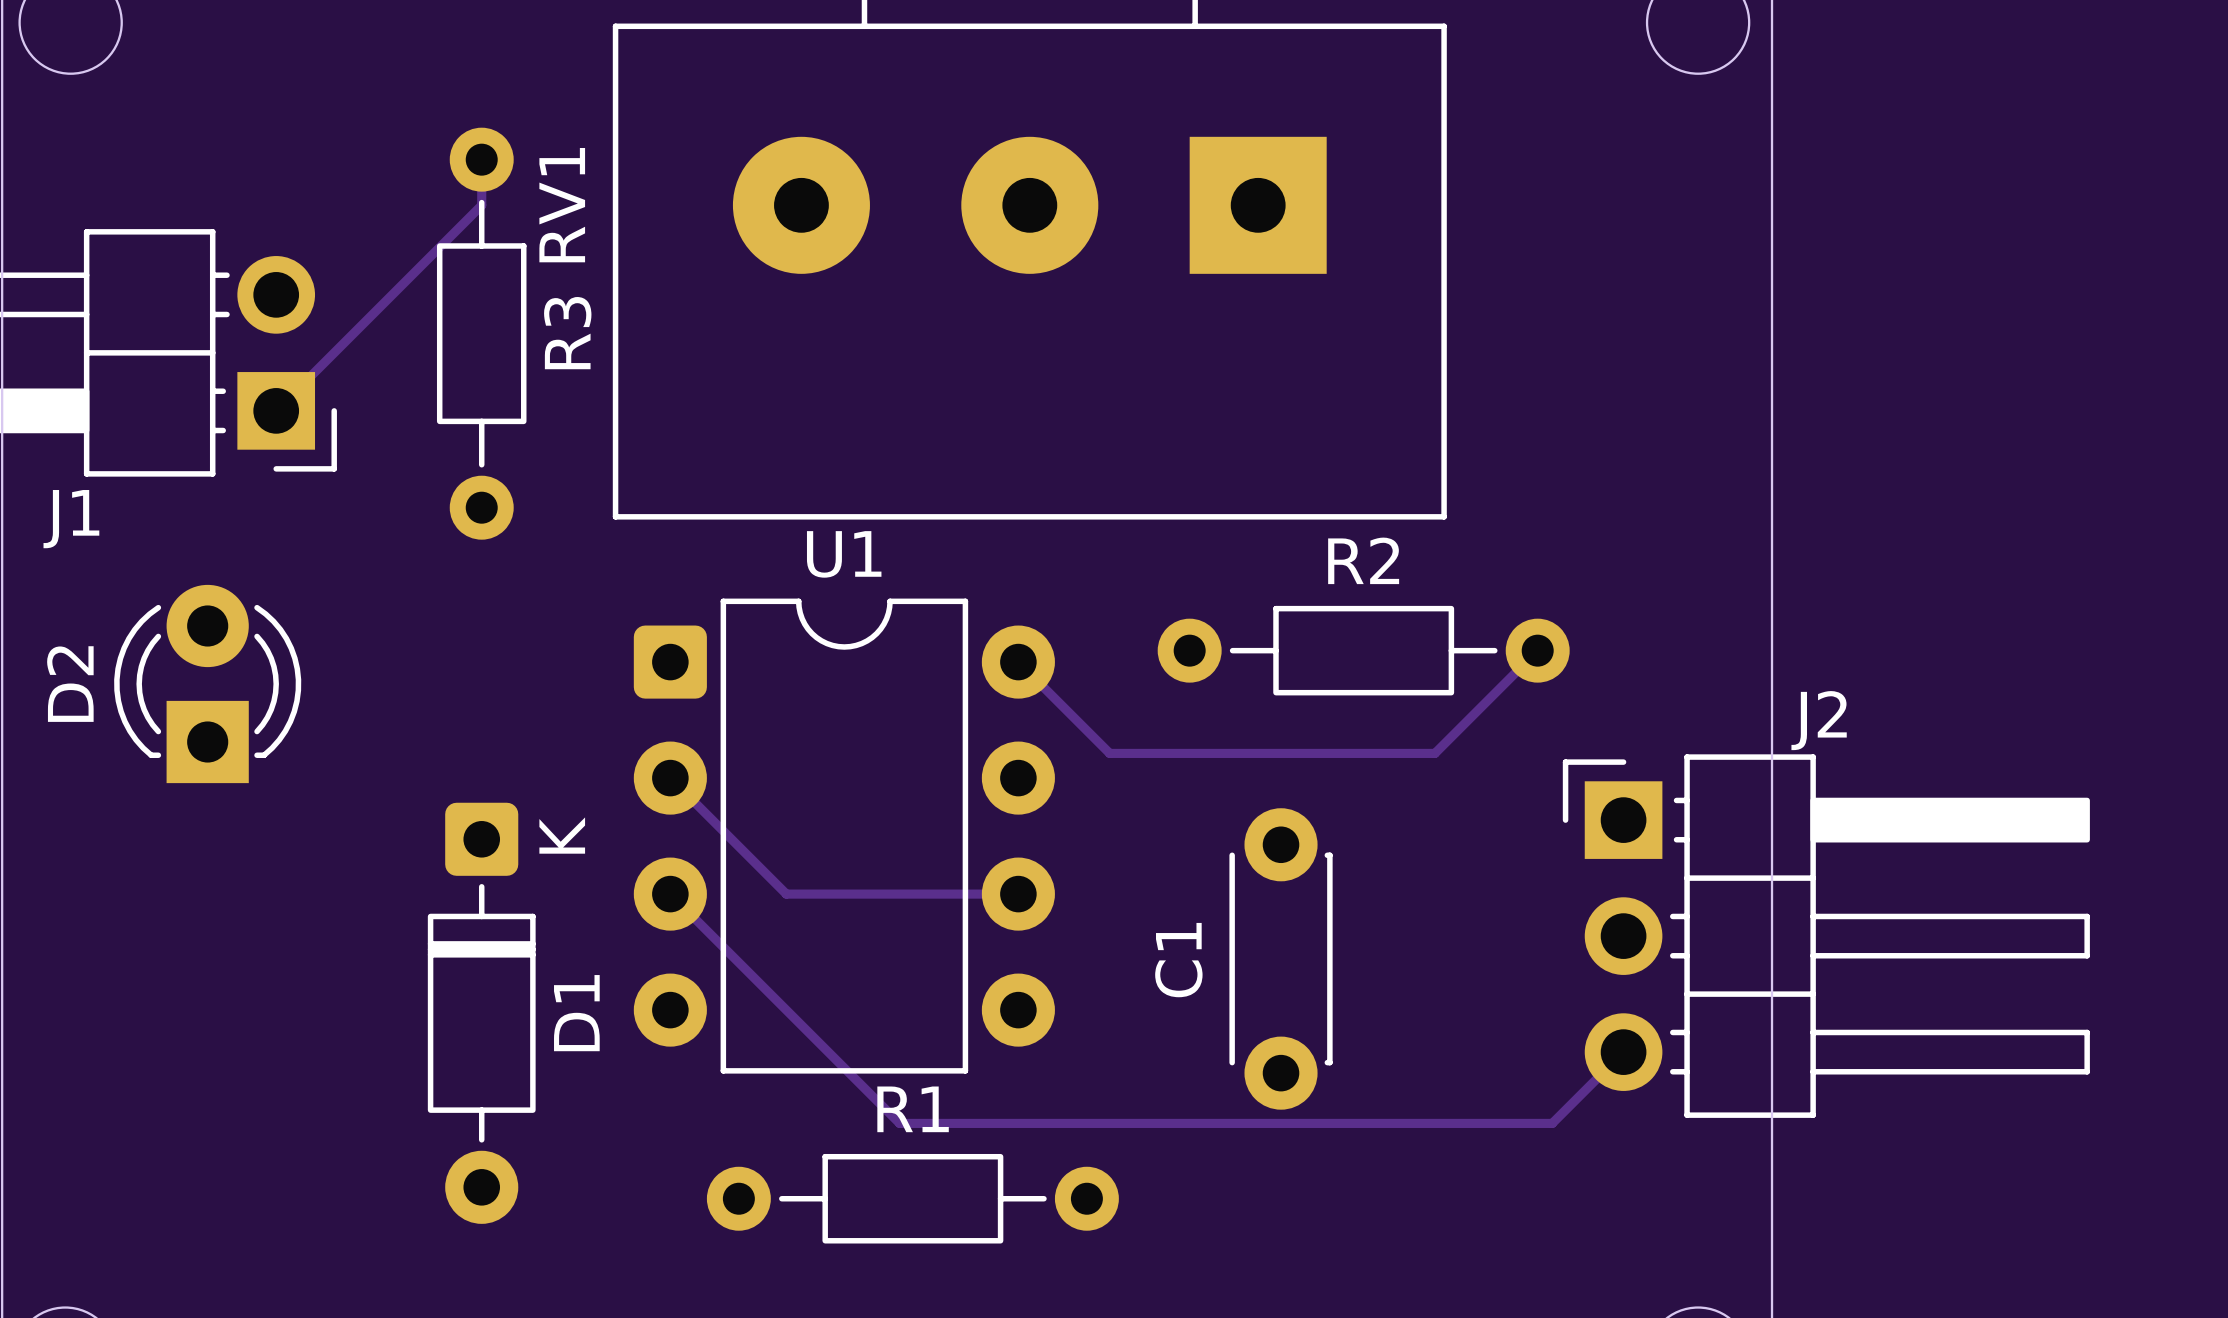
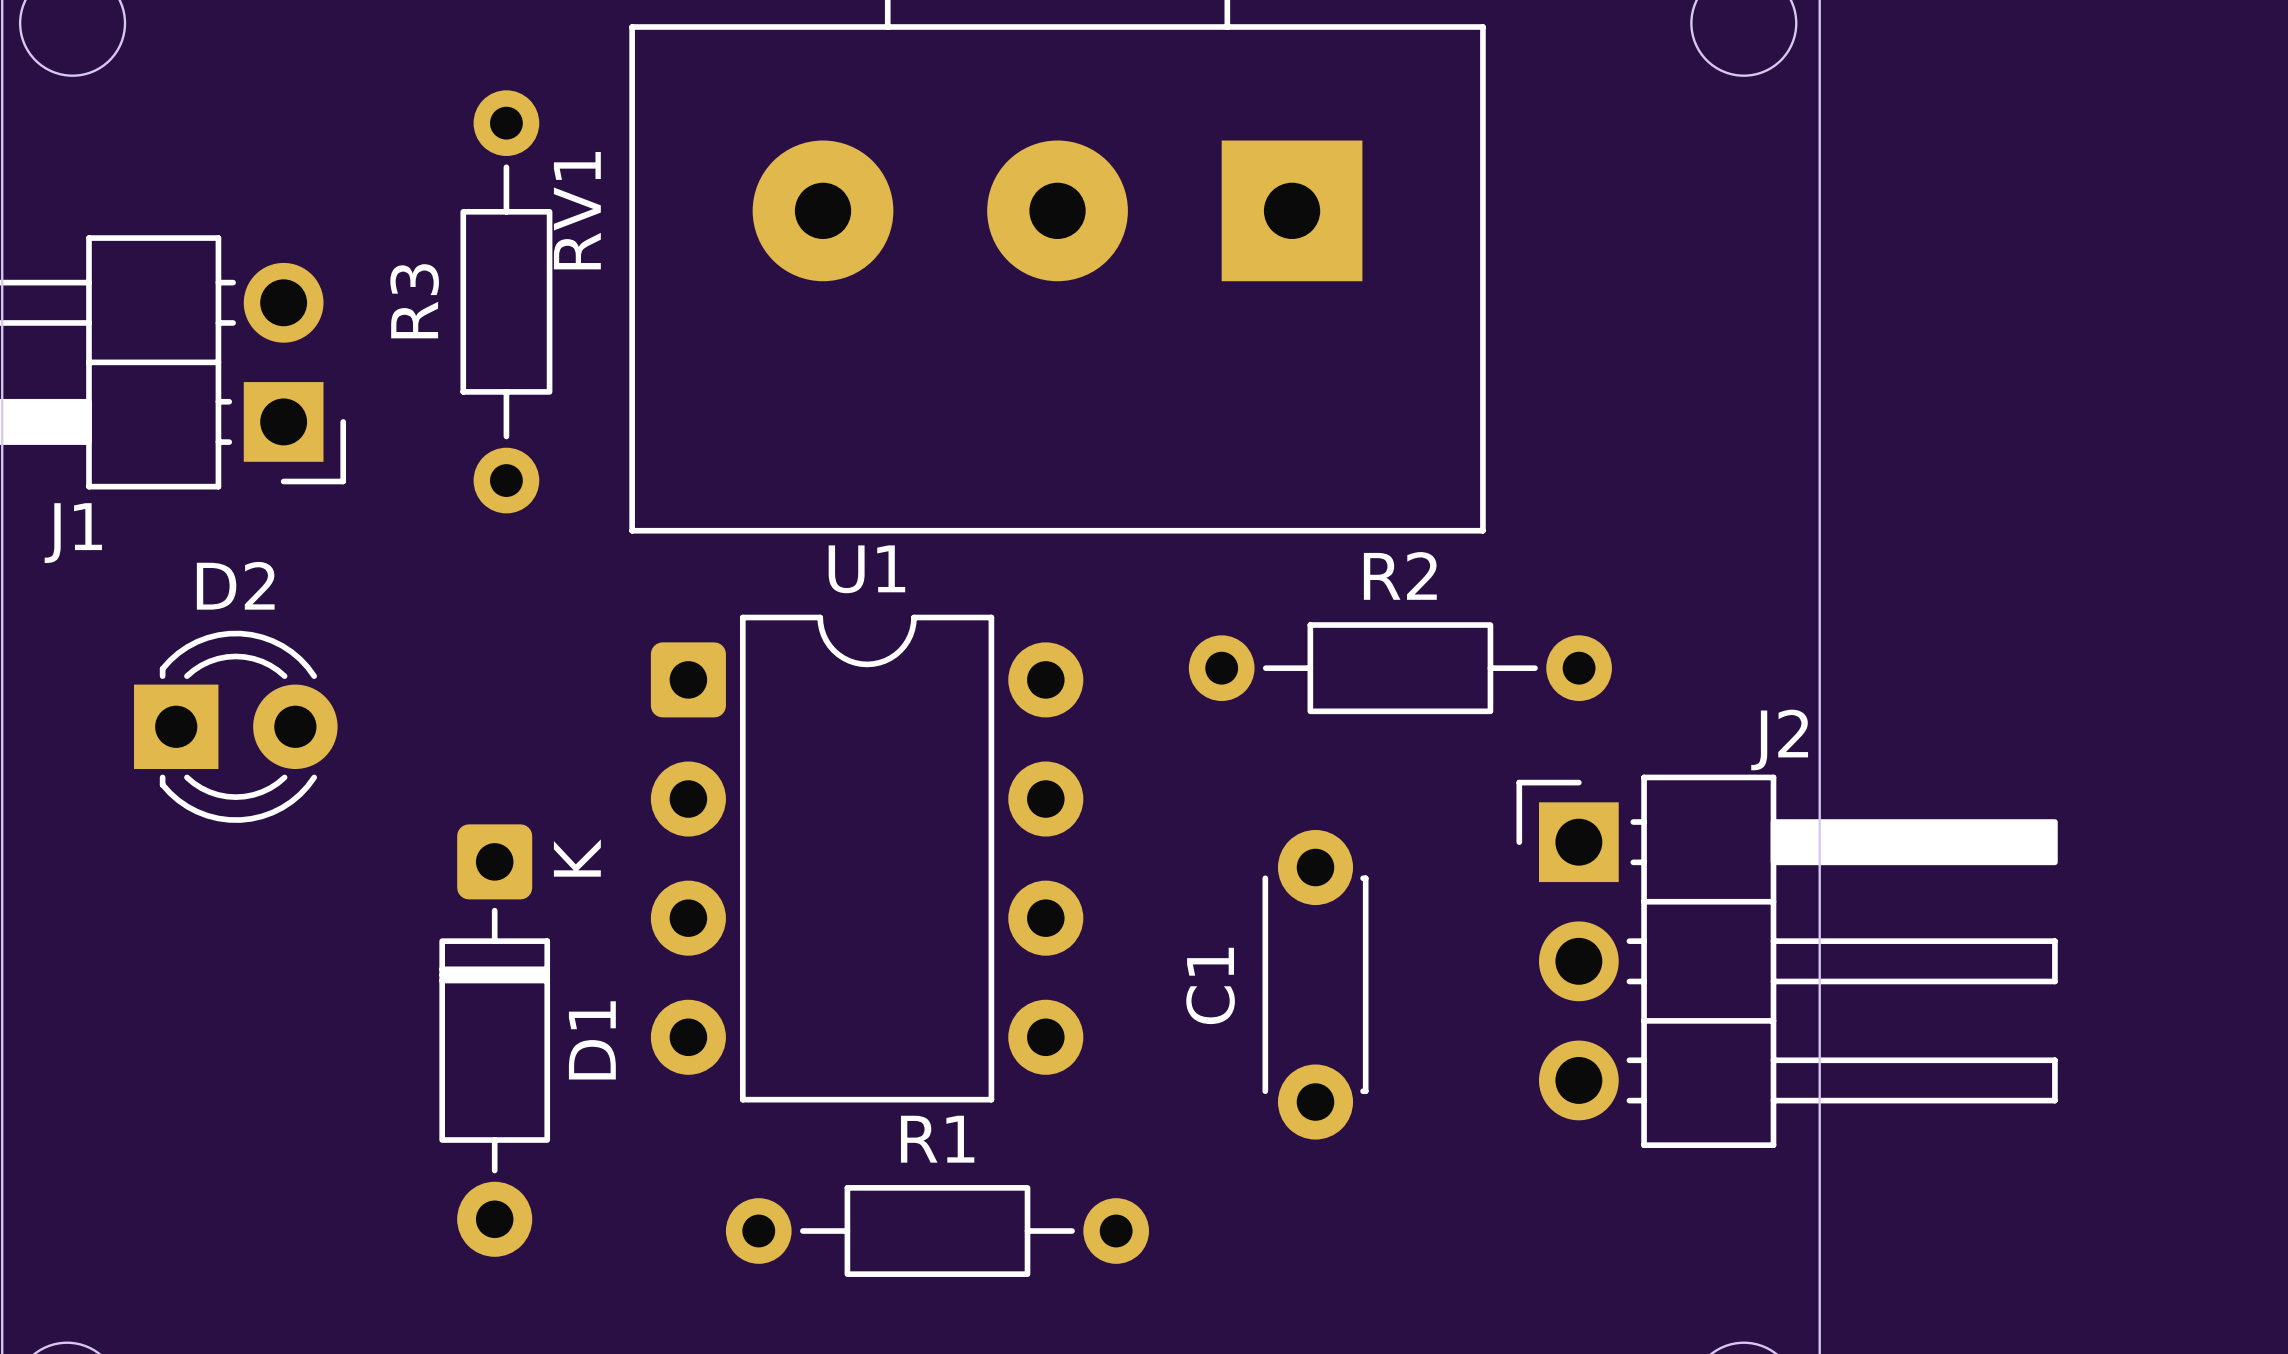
track: (481, 159) (481, 205) (276, 410) -> none
R3 position: (481, 333) -> (506, 301)
R3 name position: R3 (567, 333) -> R3 (414, 301)
track: (1537, 650) (1434, 753) (1109, 753) (1018, 662) -> none
D2 rotation: 0° (207, 683) -> 90° clockwise (235, 726)
track: (670, 778) (786, 894) (1018, 894) -> none
track: (670, 894) (899, 1123) (1552, 1123) (1623, 1052) -> none
J2 position: (1826, 936) -> (1787, 961)

